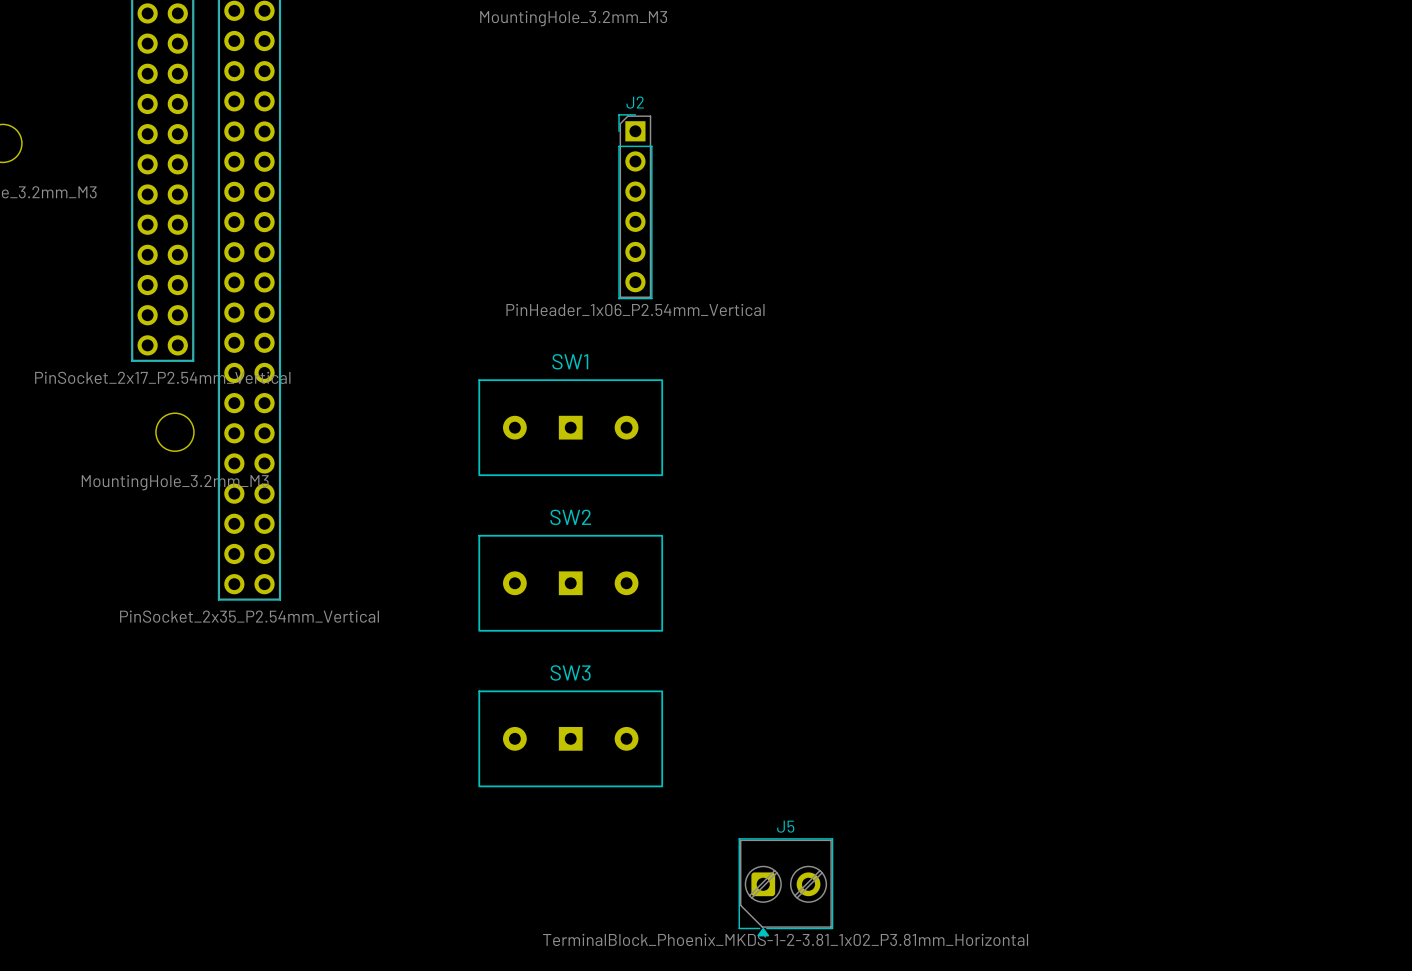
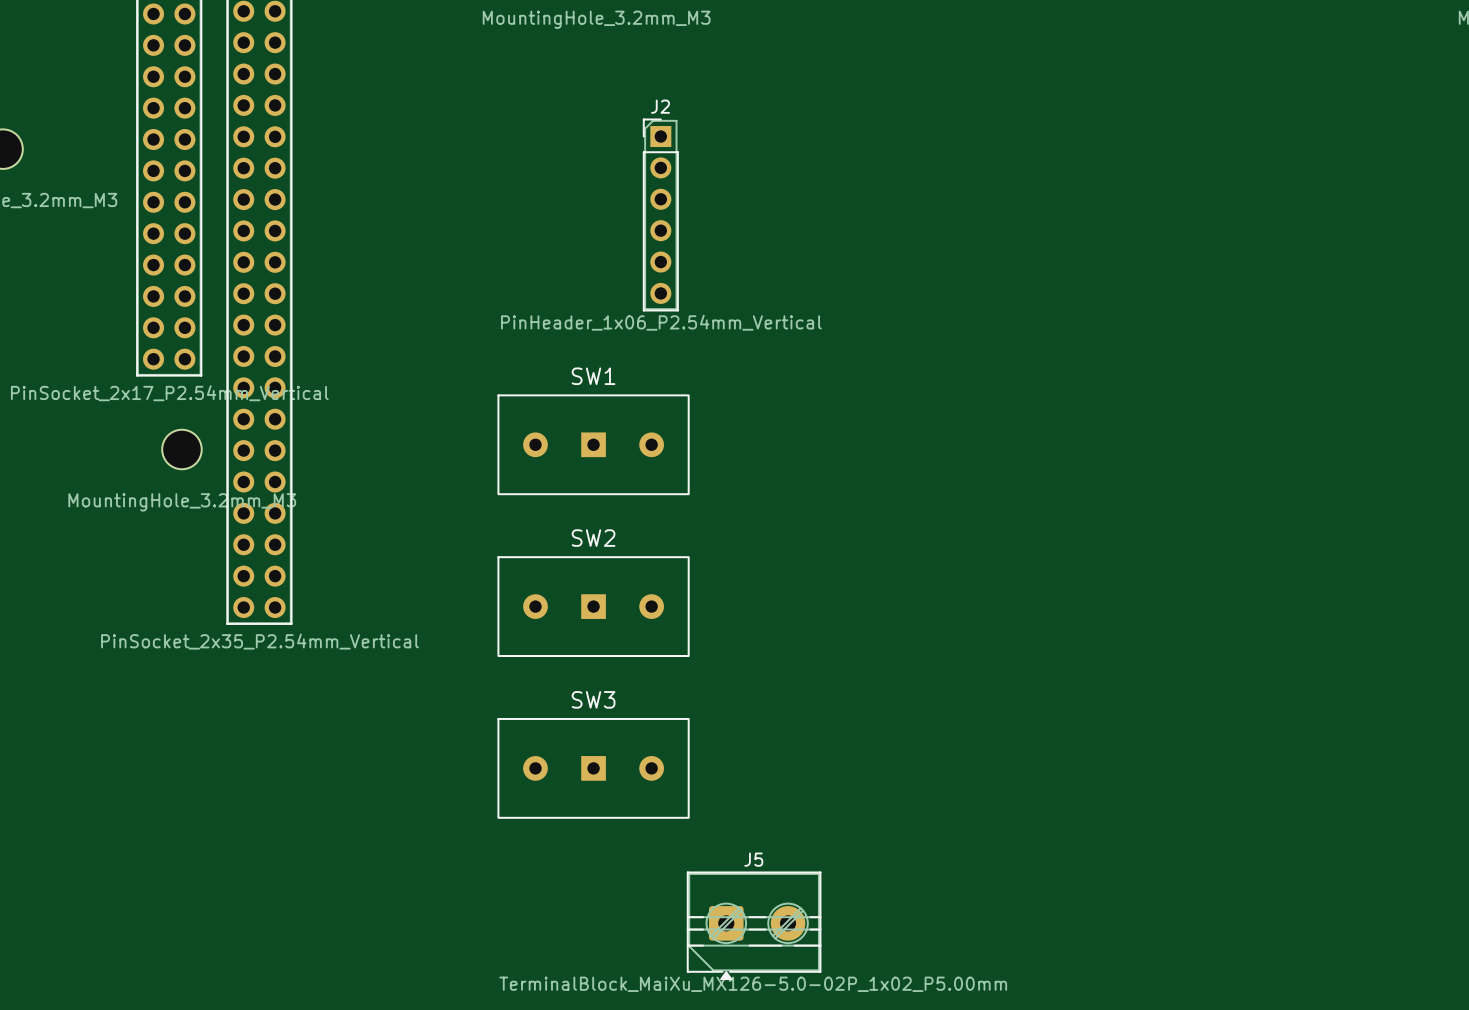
J5 footprint: [738, 838, 834, 937] -> [686, 871, 822, 981]
J5 value: TerminalBlock_Phoenix_MKDS-1-2-3.81_1x02_P3.81mm_Horizontal (785, 939) -> TerminalBlock_MaiXu_MX126-5.0-02P_1x02_P5.00mm (753, 984)

